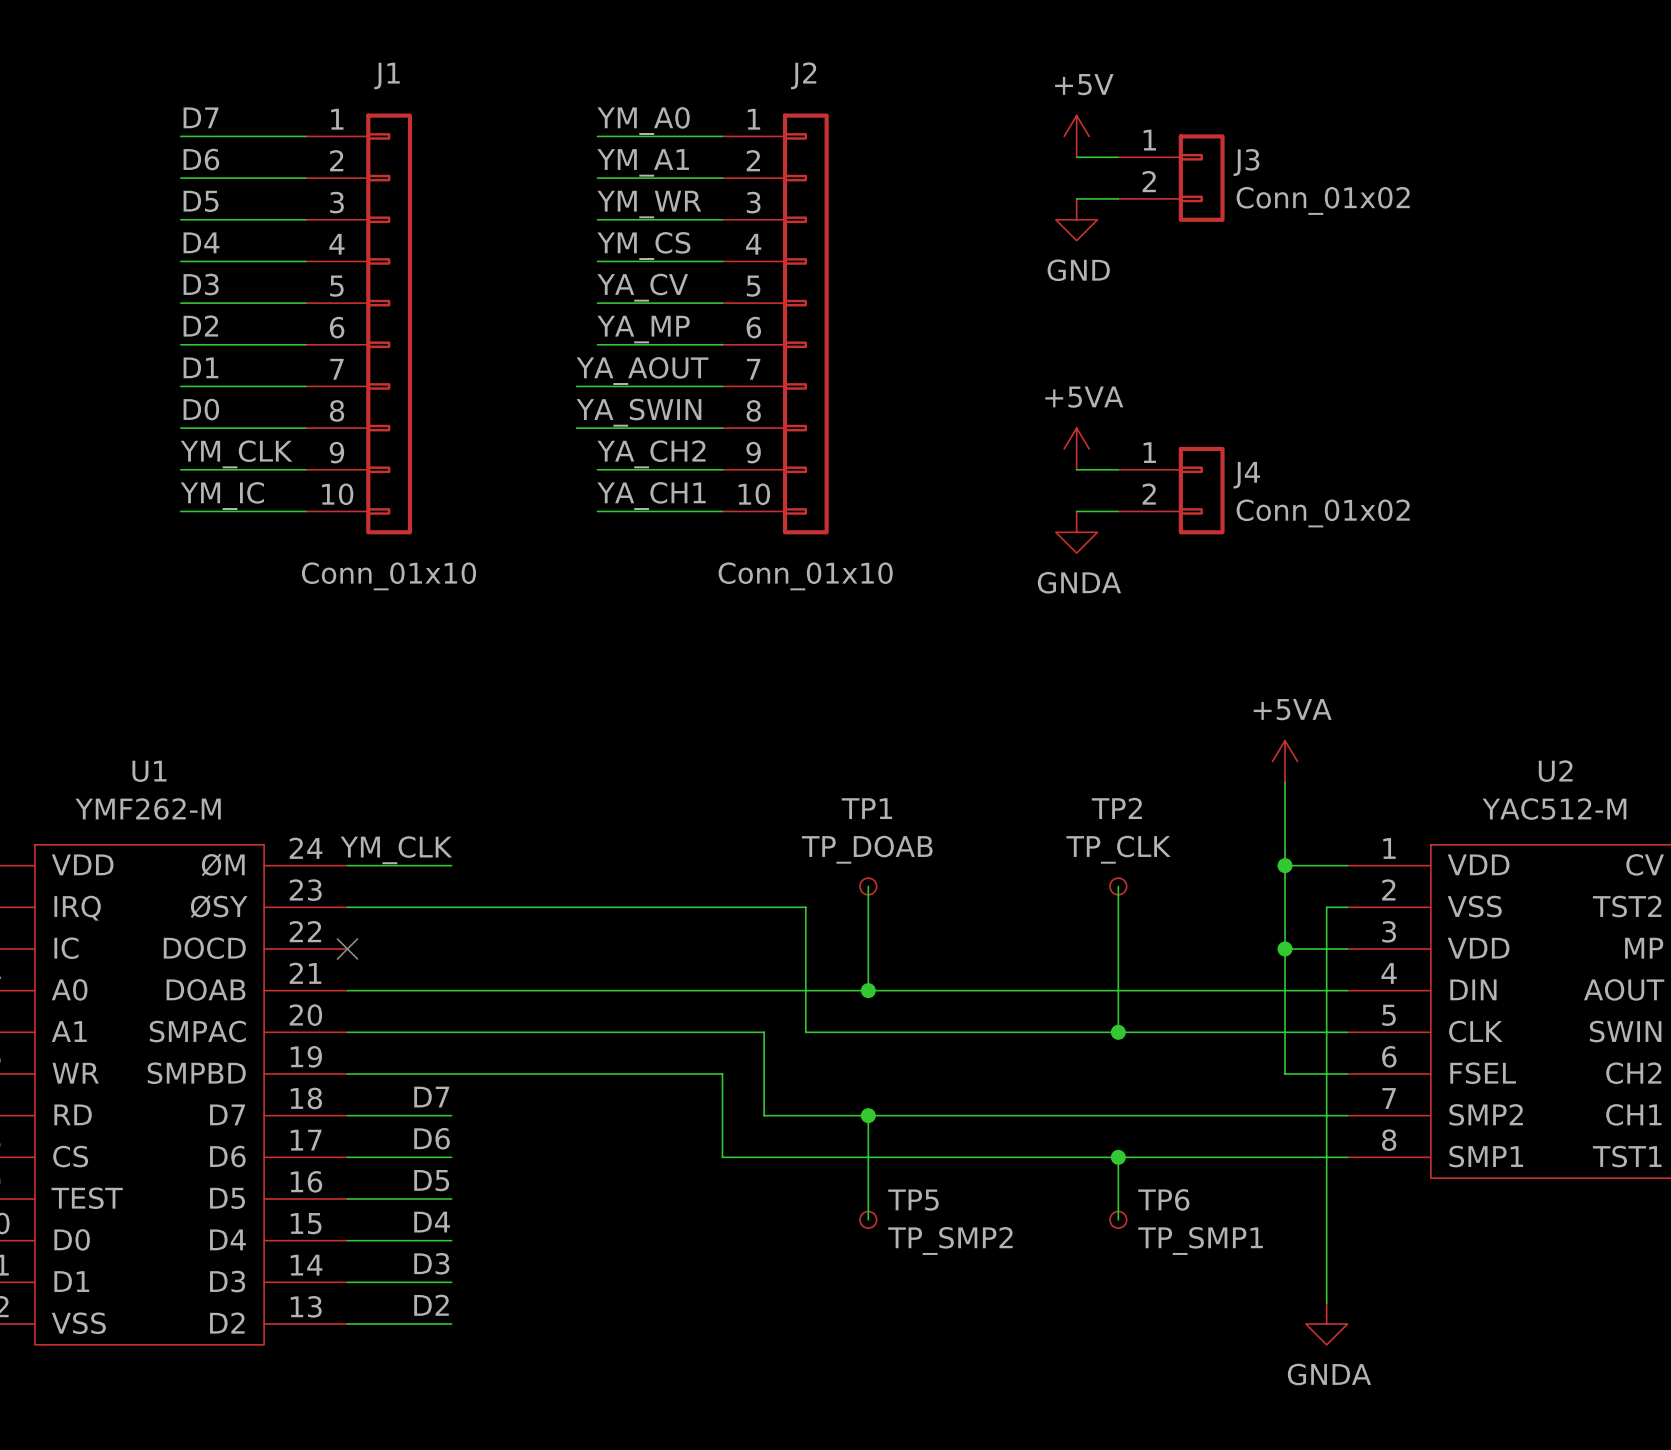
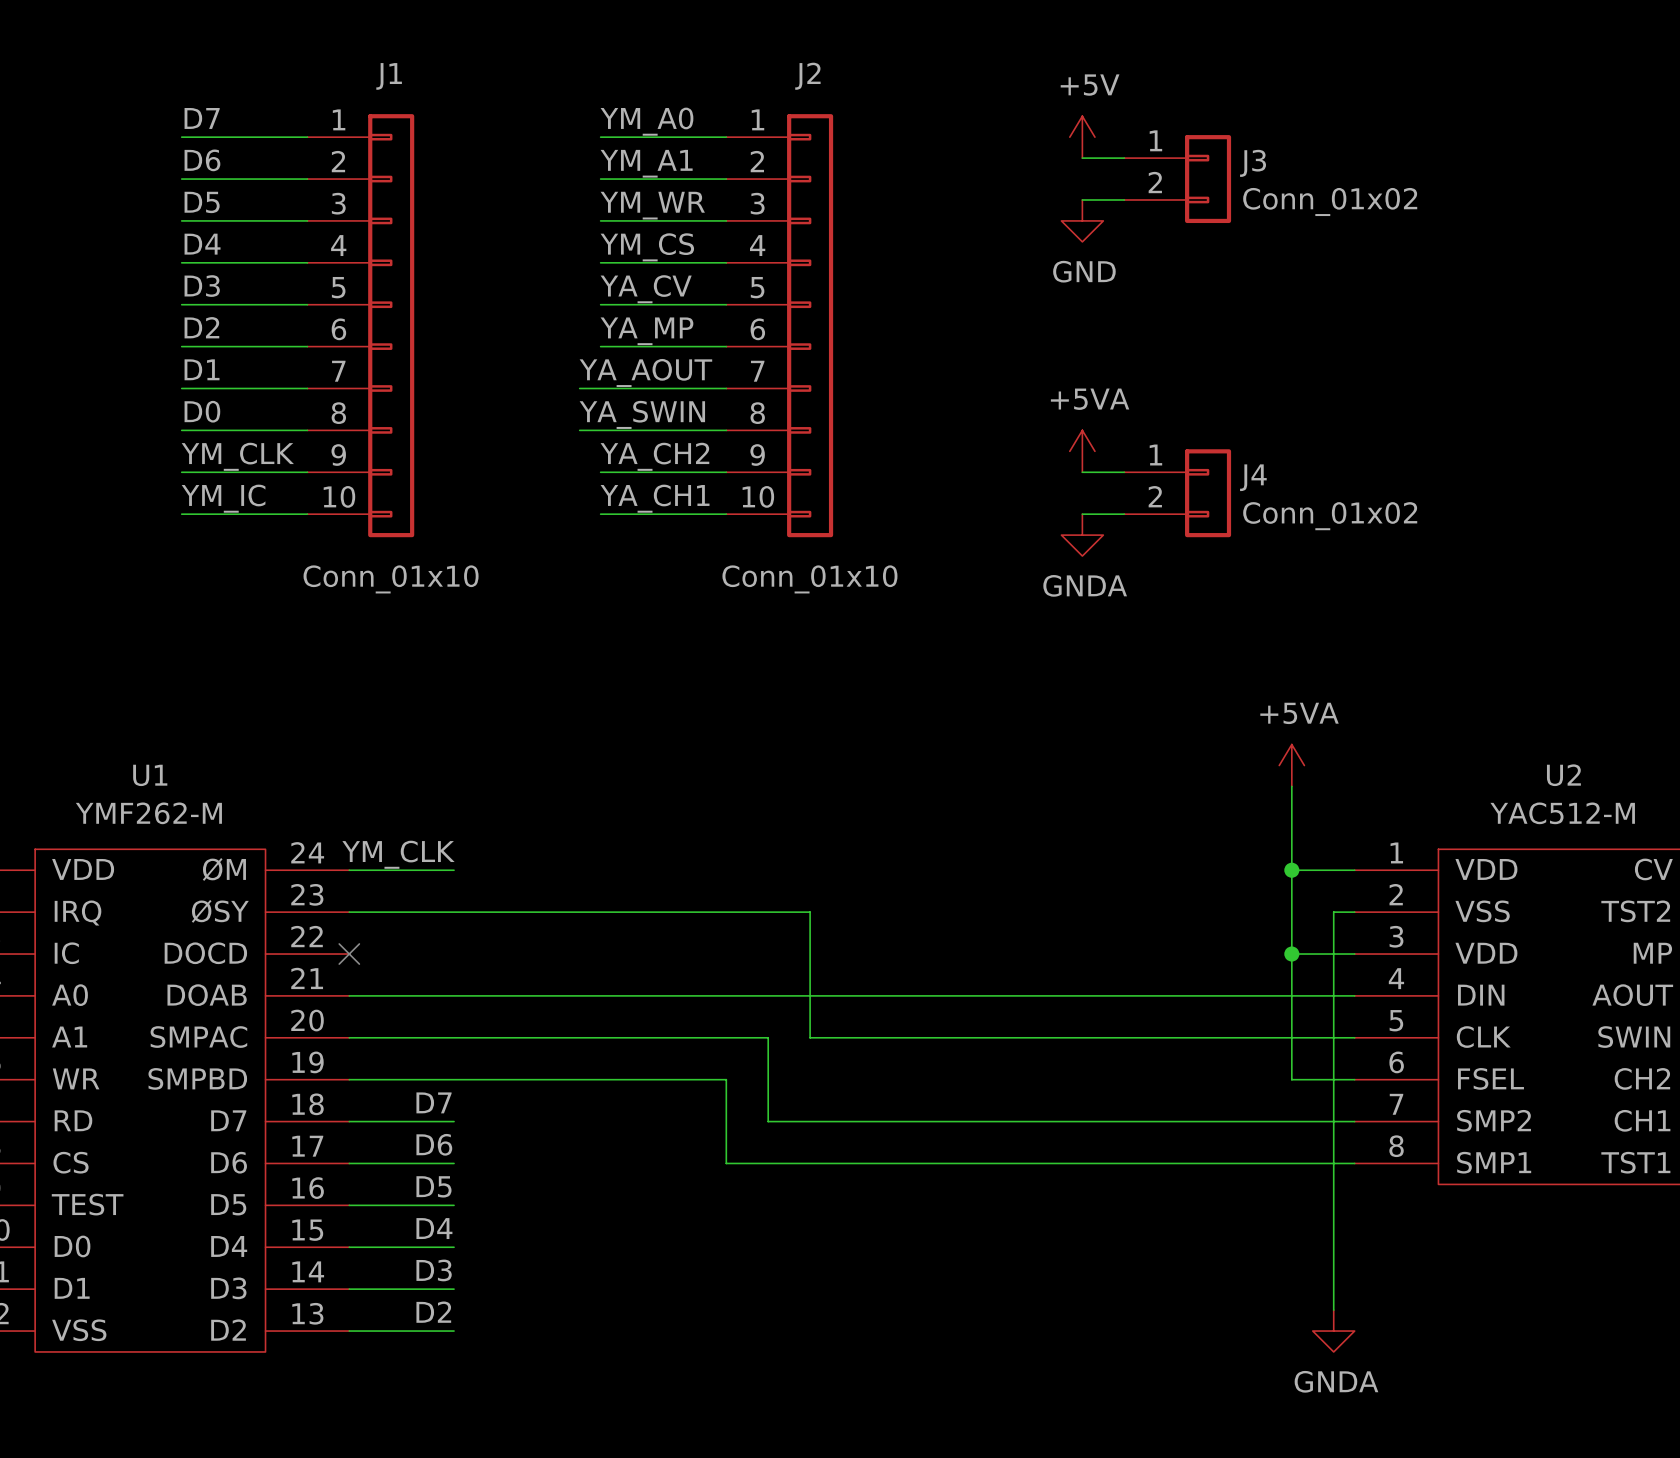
wire: (868, 886) (868, 990) -> none
TP1: TP_DOAB (868, 886) -> none
wire: (1118, 886) (1118, 1032) -> none
TP2: TP_CLK (1118, 886) -> none
junction: (868, 990) -> none
junction: (1118, 1032) -> none
wire: (868, 1115) (868, 1219) -> none
junction: (868, 1115) -> none
wire: (1118, 1157) (1118, 1219) -> none
junction: (1118, 1157) -> none
TP5: TP_SMP2 (868, 1219) -> none
TP6: TP_SMP1 (1118, 1219) -> none

